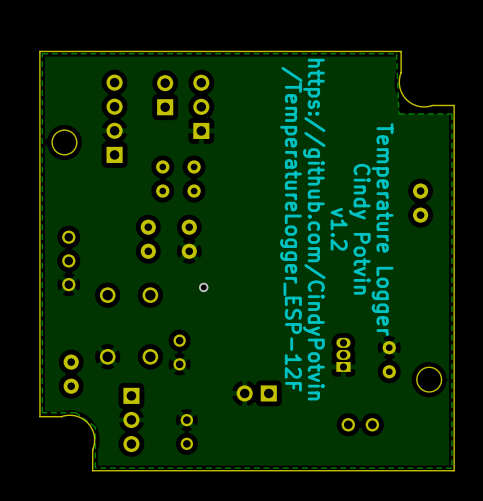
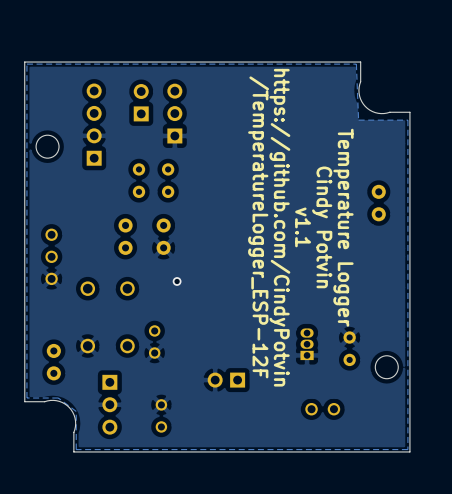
text: v1.2 (339, 229) -> v1.1 (303, 227)

